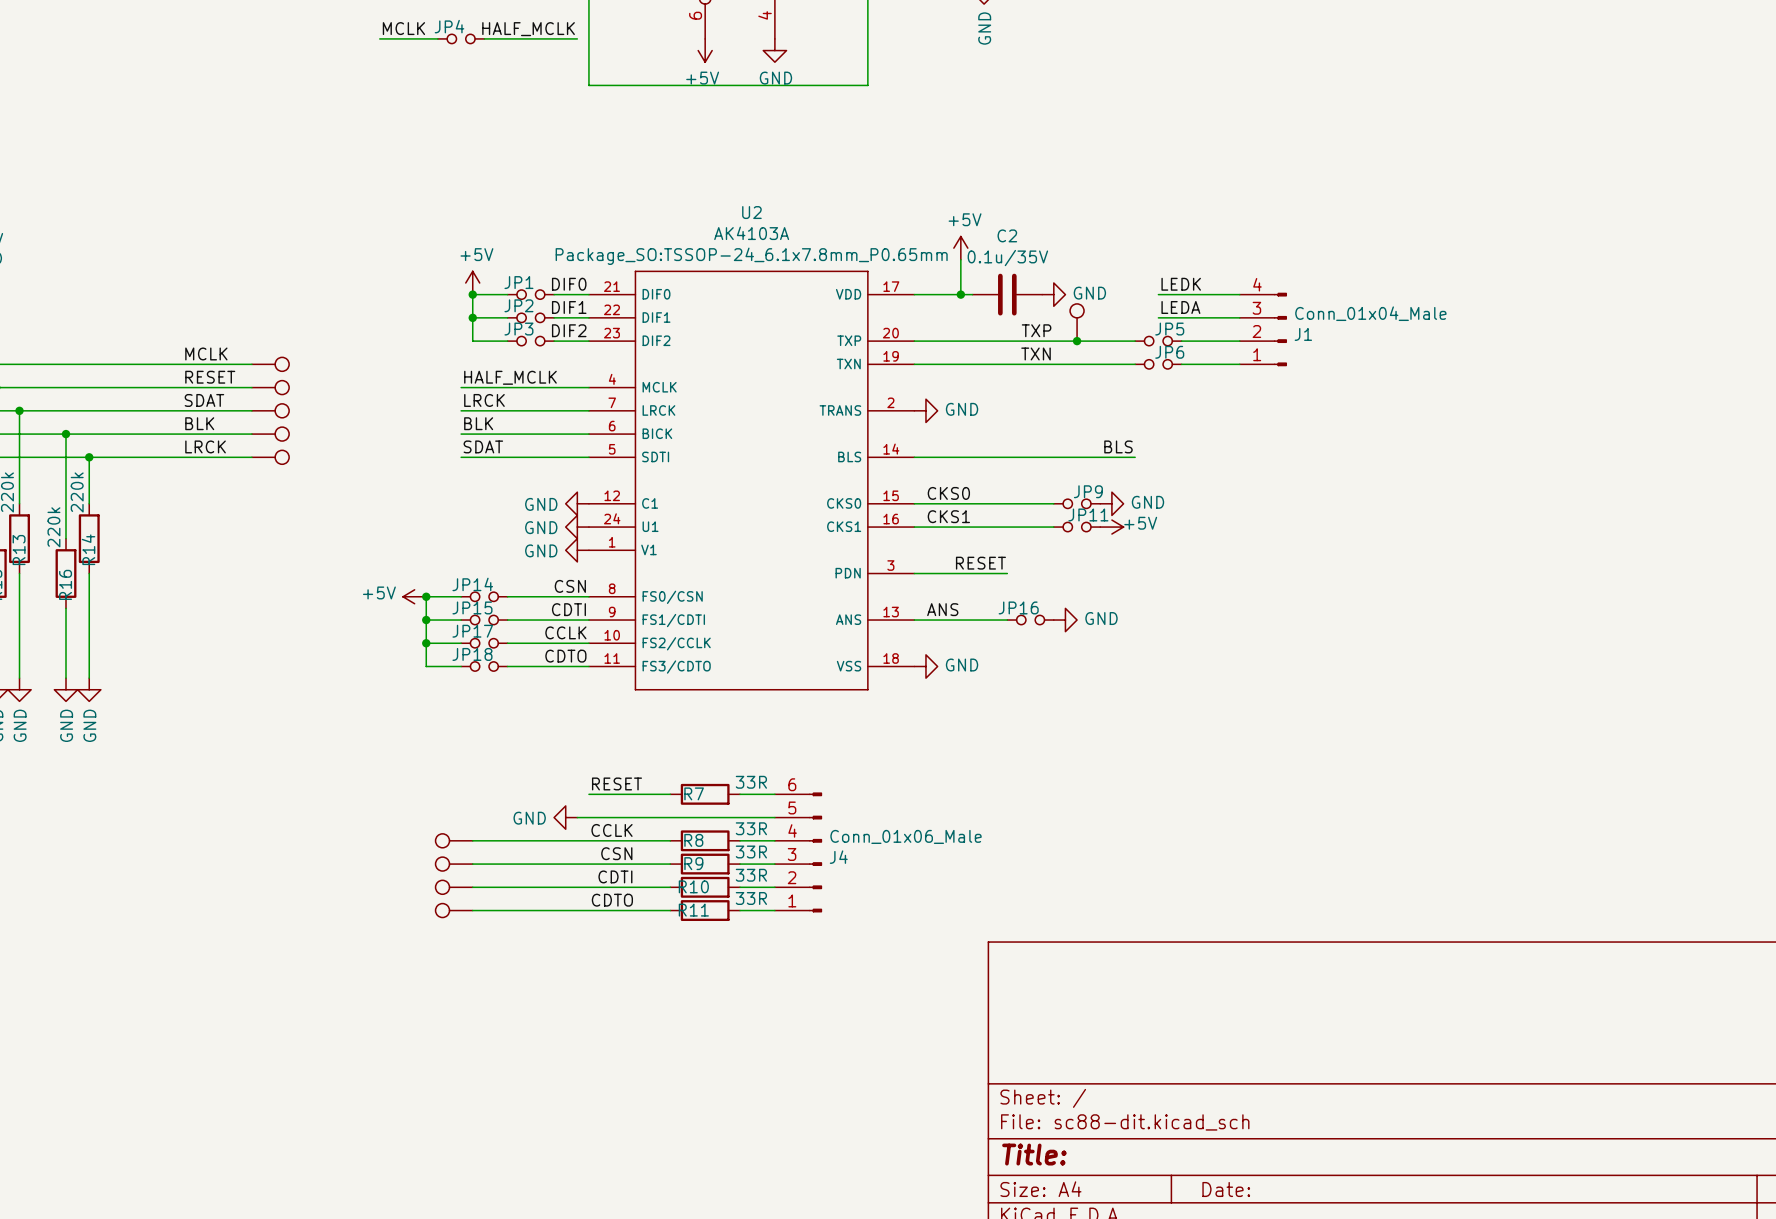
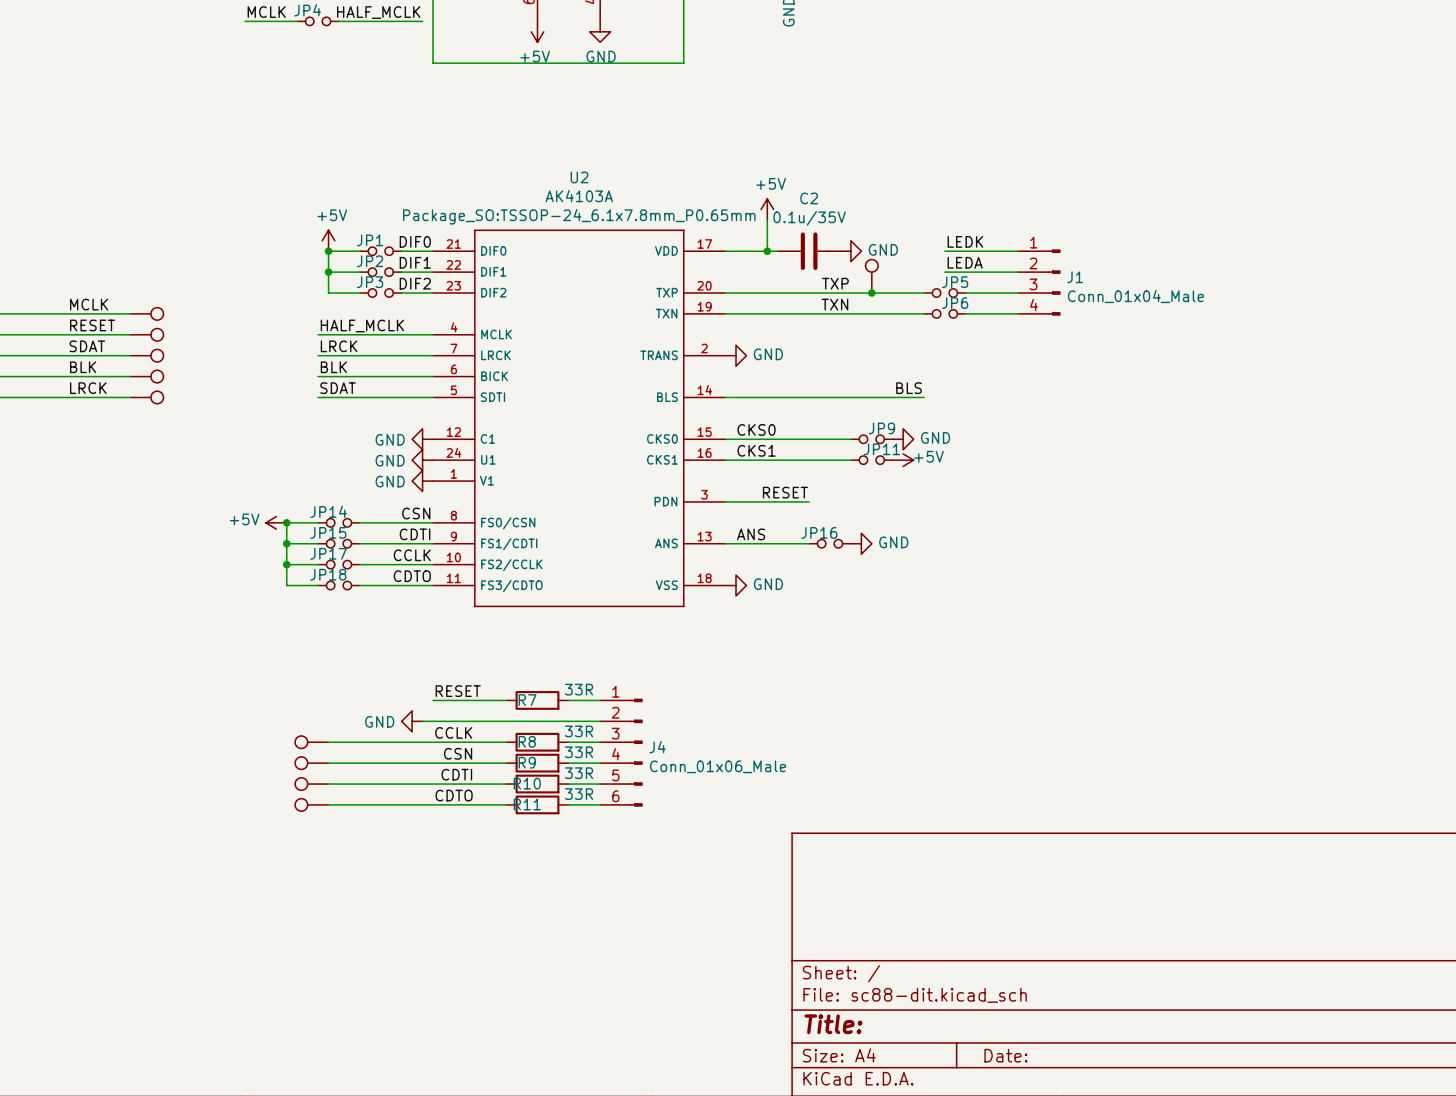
J1 flip: as is (1280, 329) -> up-down (1054, 282)
J4 flip: as is (815, 852) -> up-down (636, 752)

